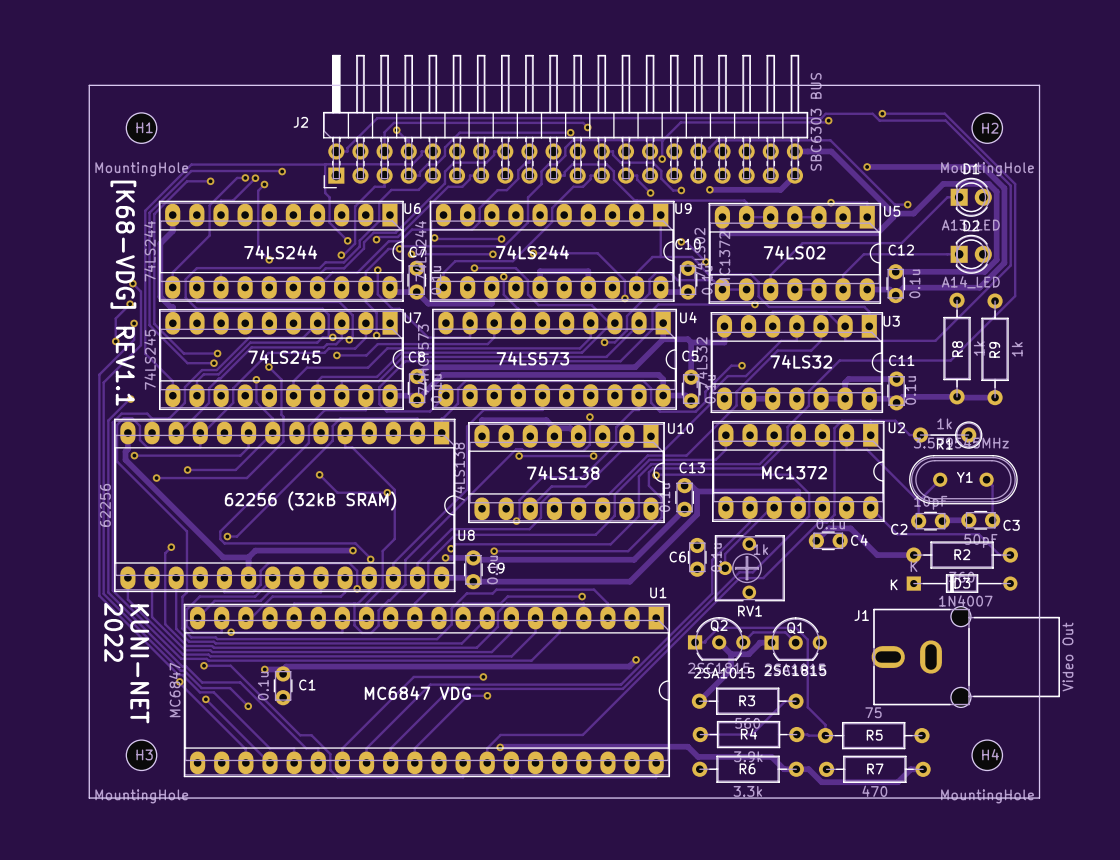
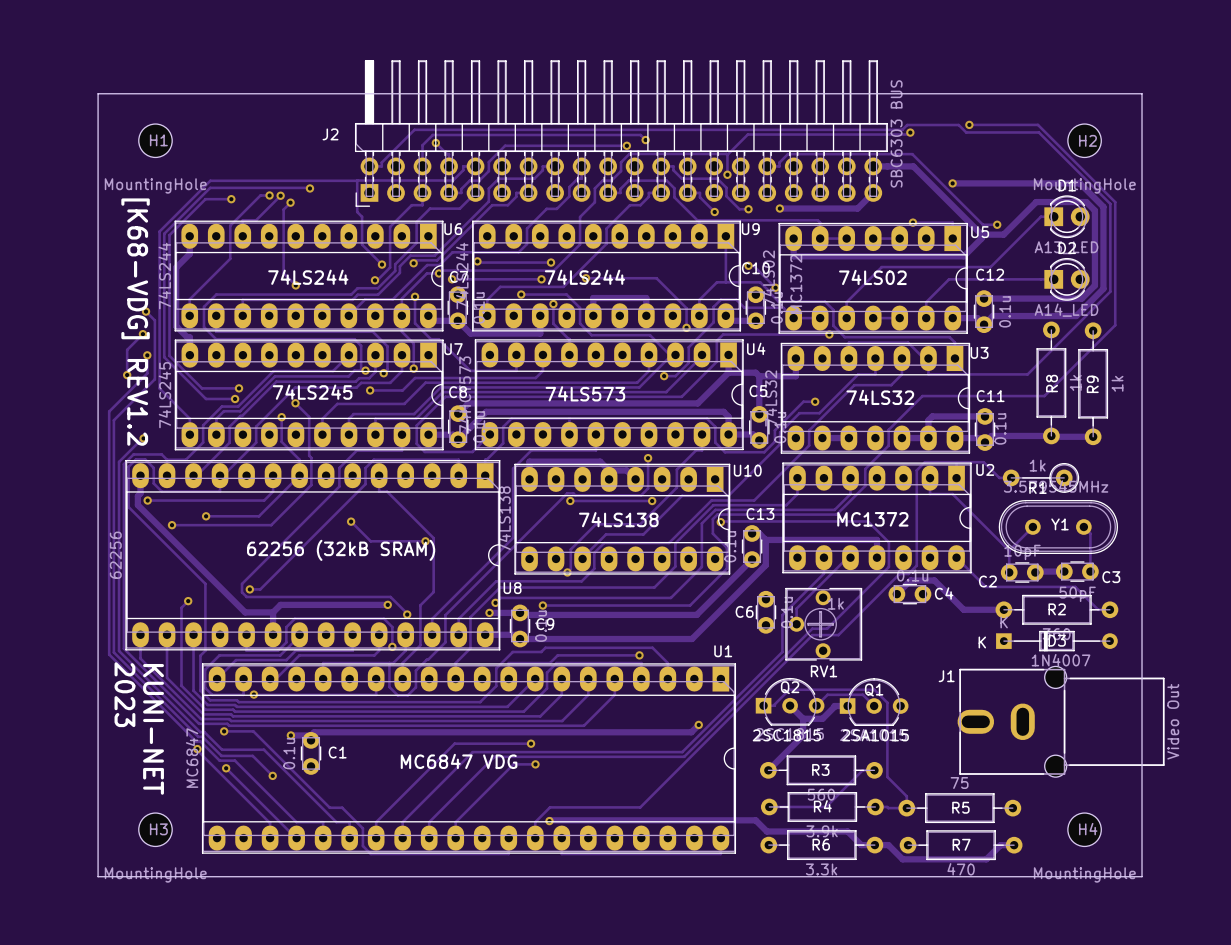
text: [K68-VDG] REV1.1 (123, 293) -> [K68-VDG] REV1.2 (135, 322)
text: 2022 (113, 632) -> 2023 (124, 694)
text: 2SC1815 (795, 670) -> 2SA1015 (875, 735)
text: 2SA1015 (724, 673) -> 2SC1815 (786, 735)

